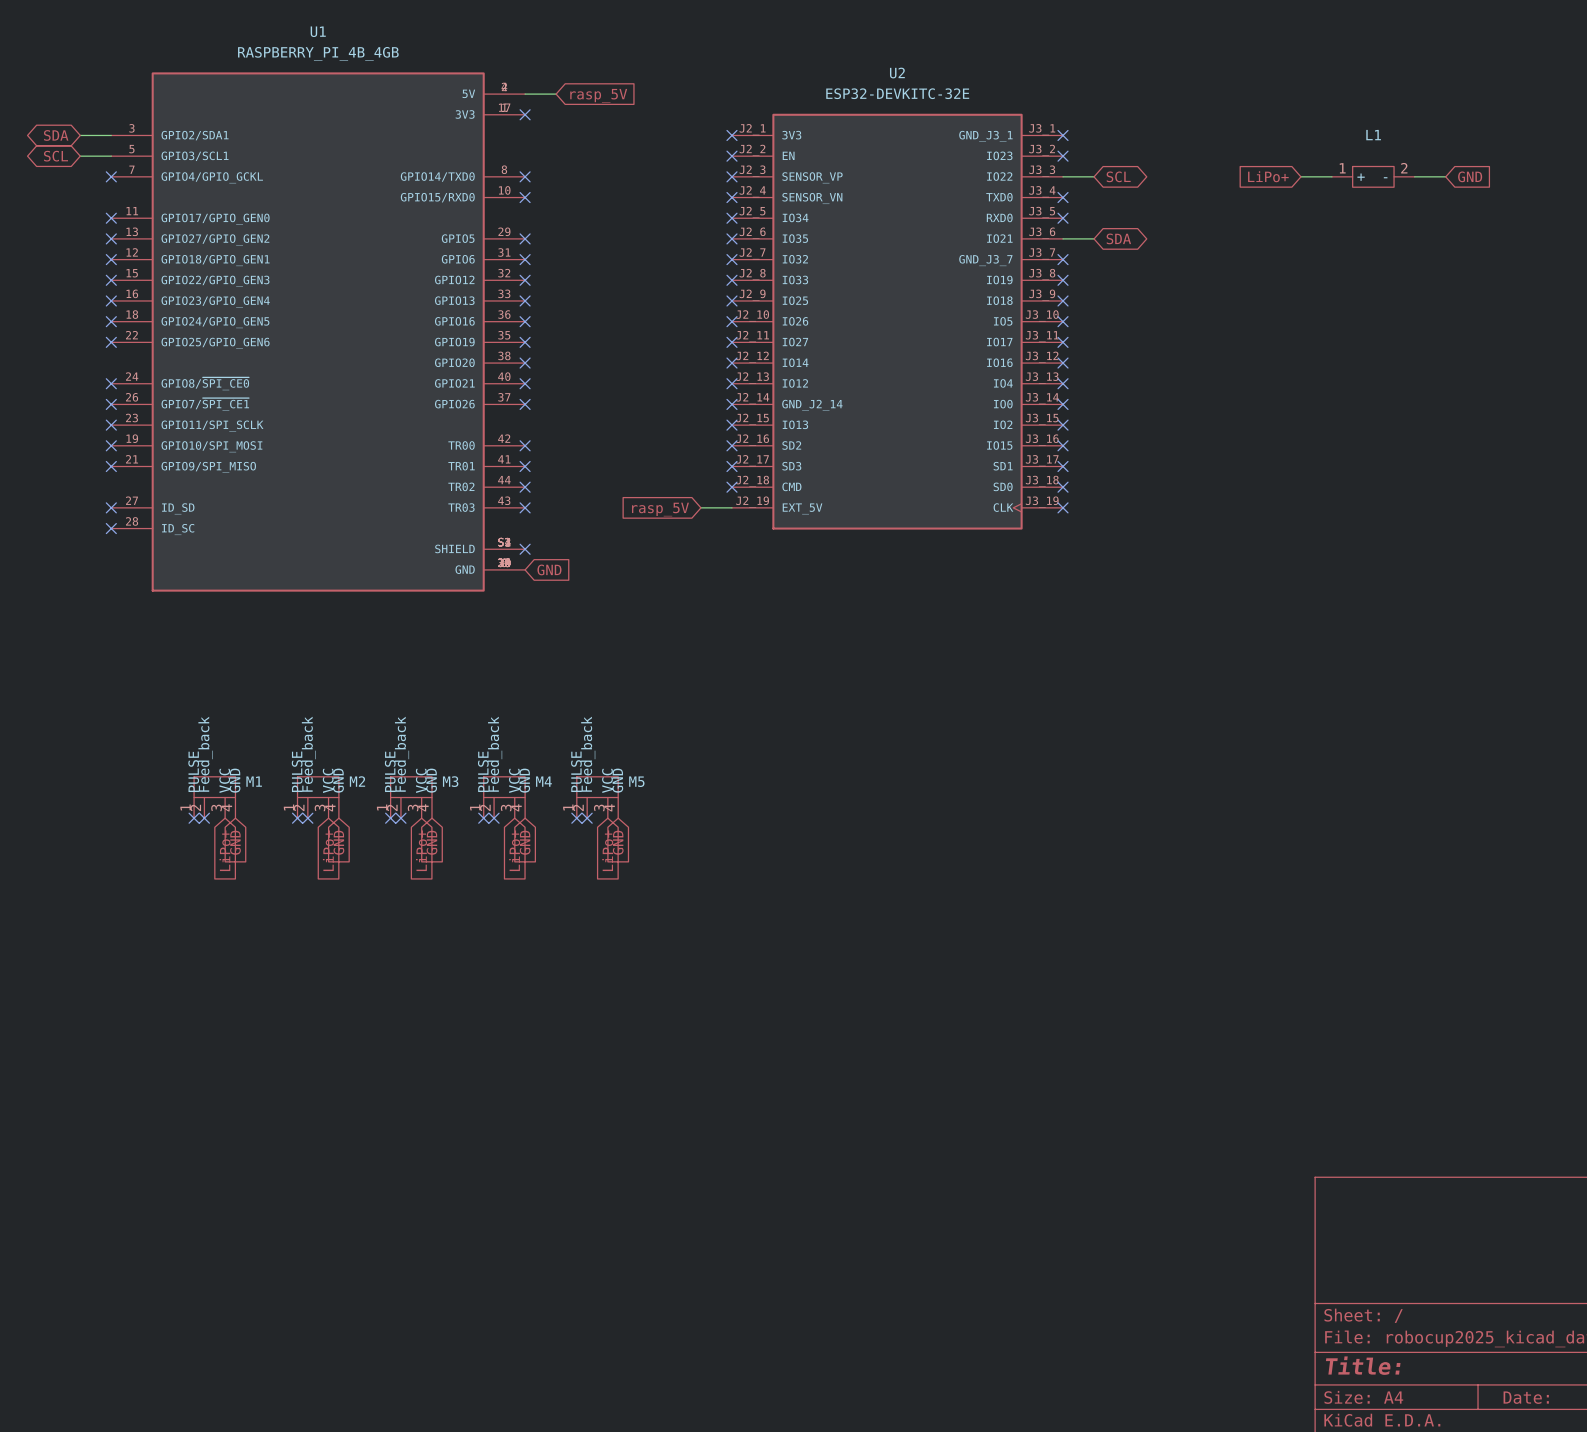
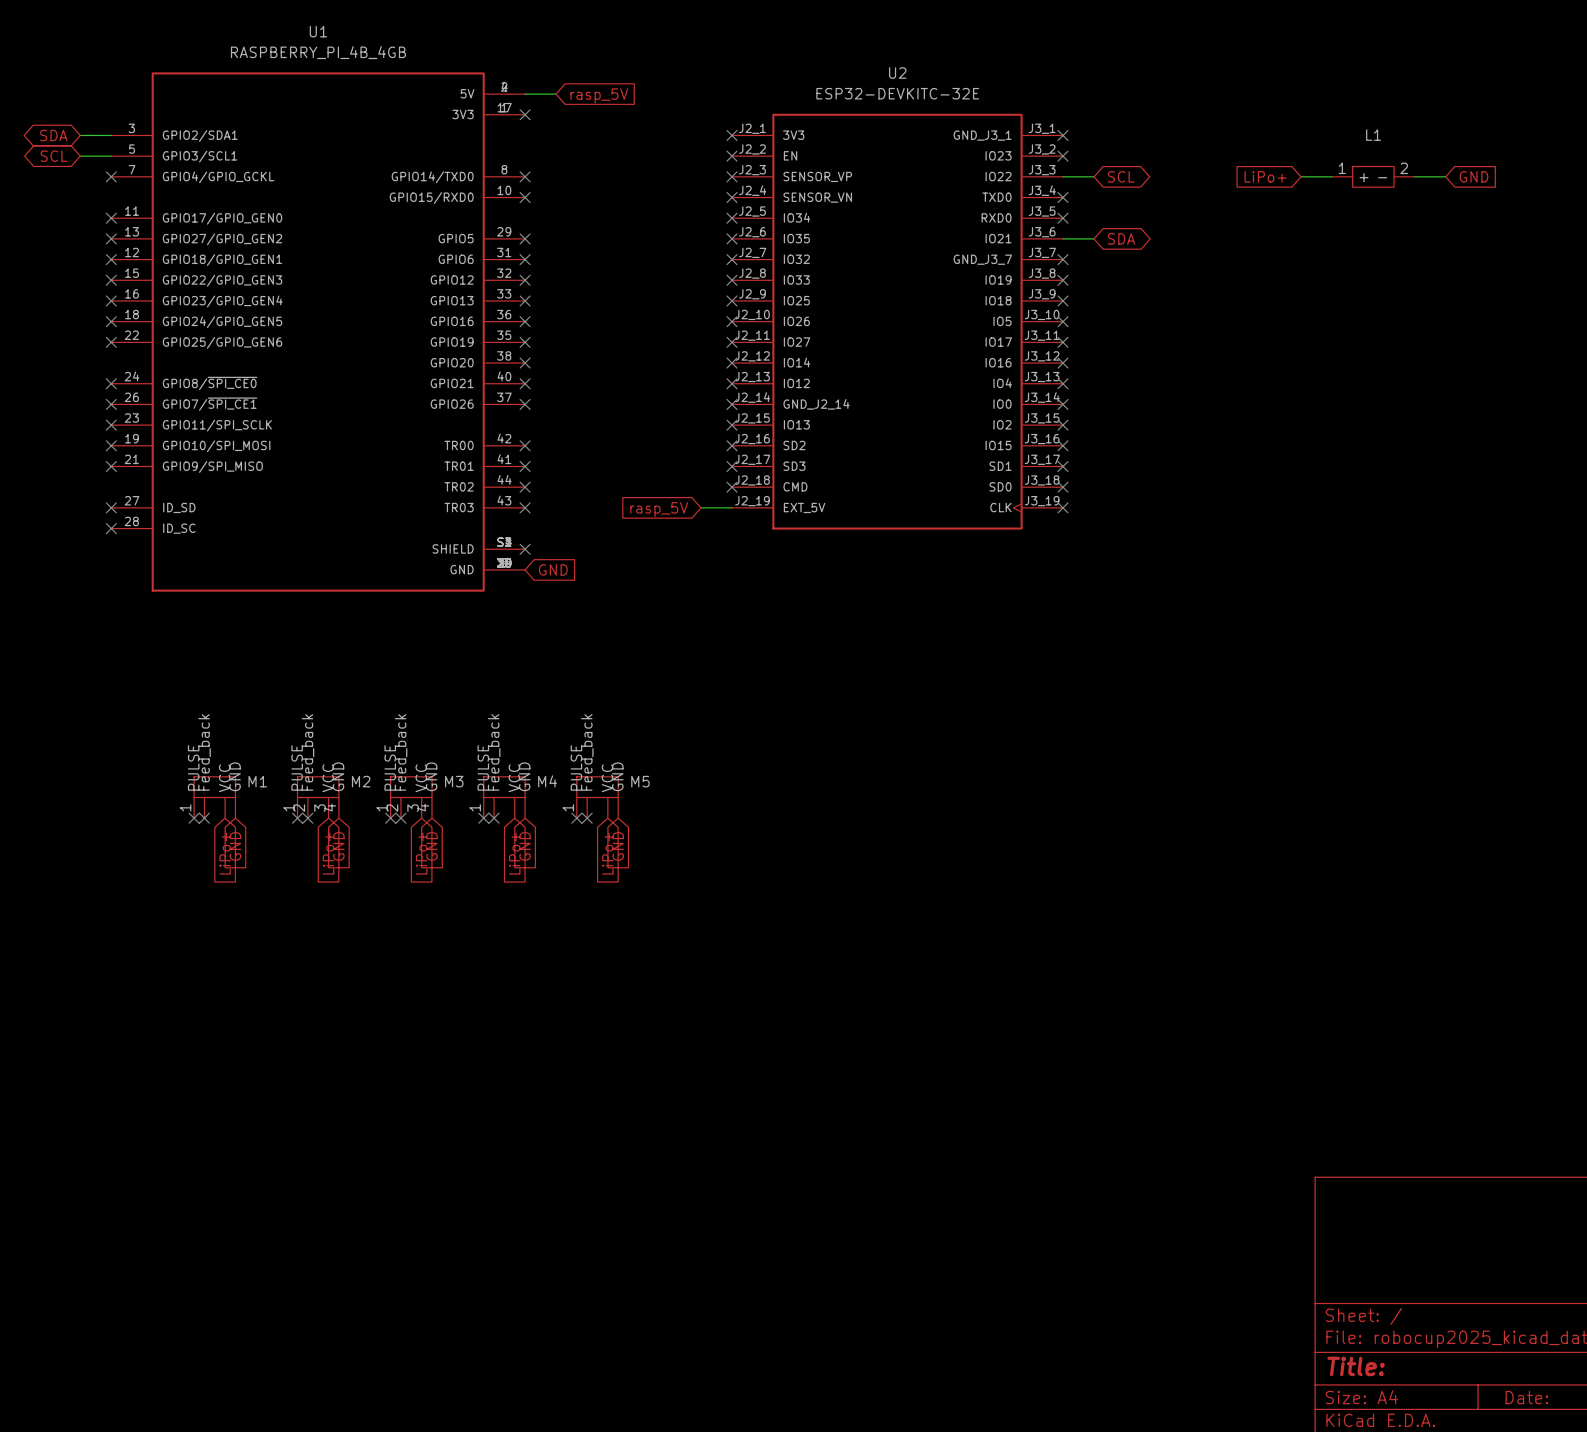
M1 pin number: 2 (195, 807) -> none
M1 pin number: 3 (216, 807) -> none
M1 pin number: 4 (226, 807) -> none
M4 pin number: 2 (485, 807) -> none
M4 pin number: 3 (506, 807) -> none
M4 pin number: 4 (516, 807) -> none
M5 pin number: 2 (578, 807) -> none
M5 pin number: 3 (599, 807) -> none
M5 pin number: 4 (609, 807) -> none

